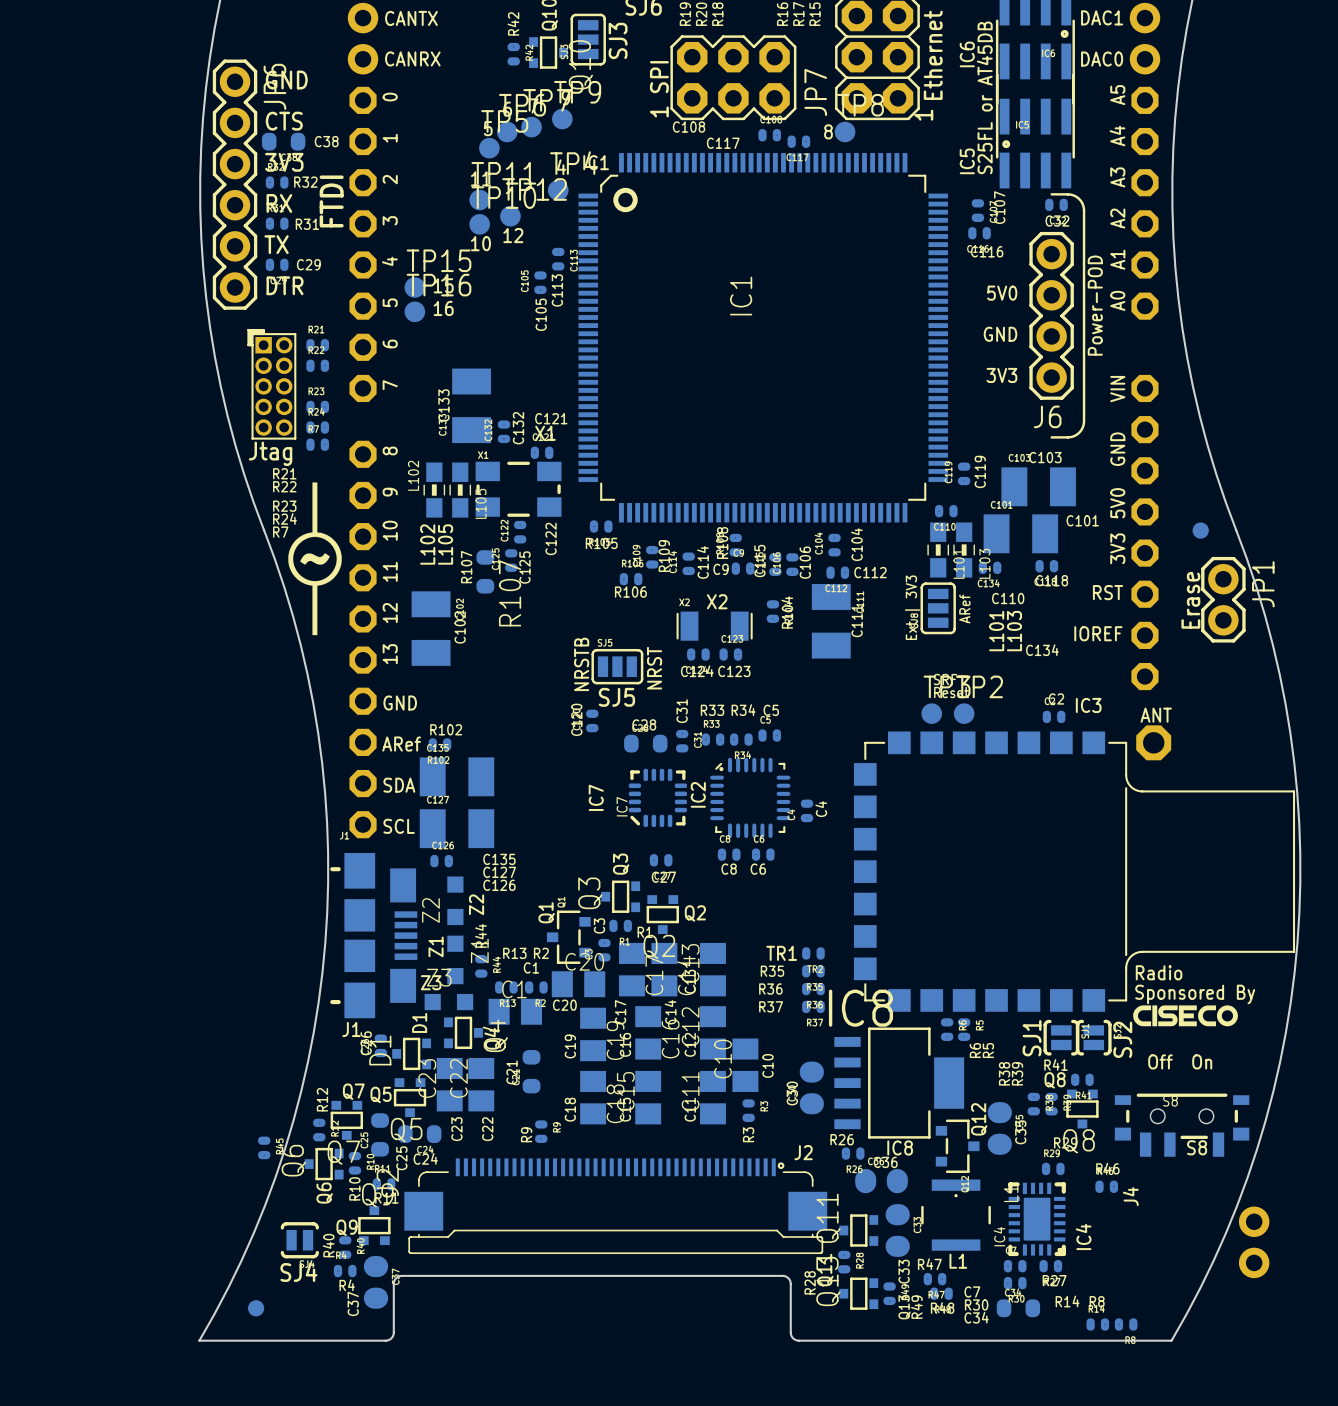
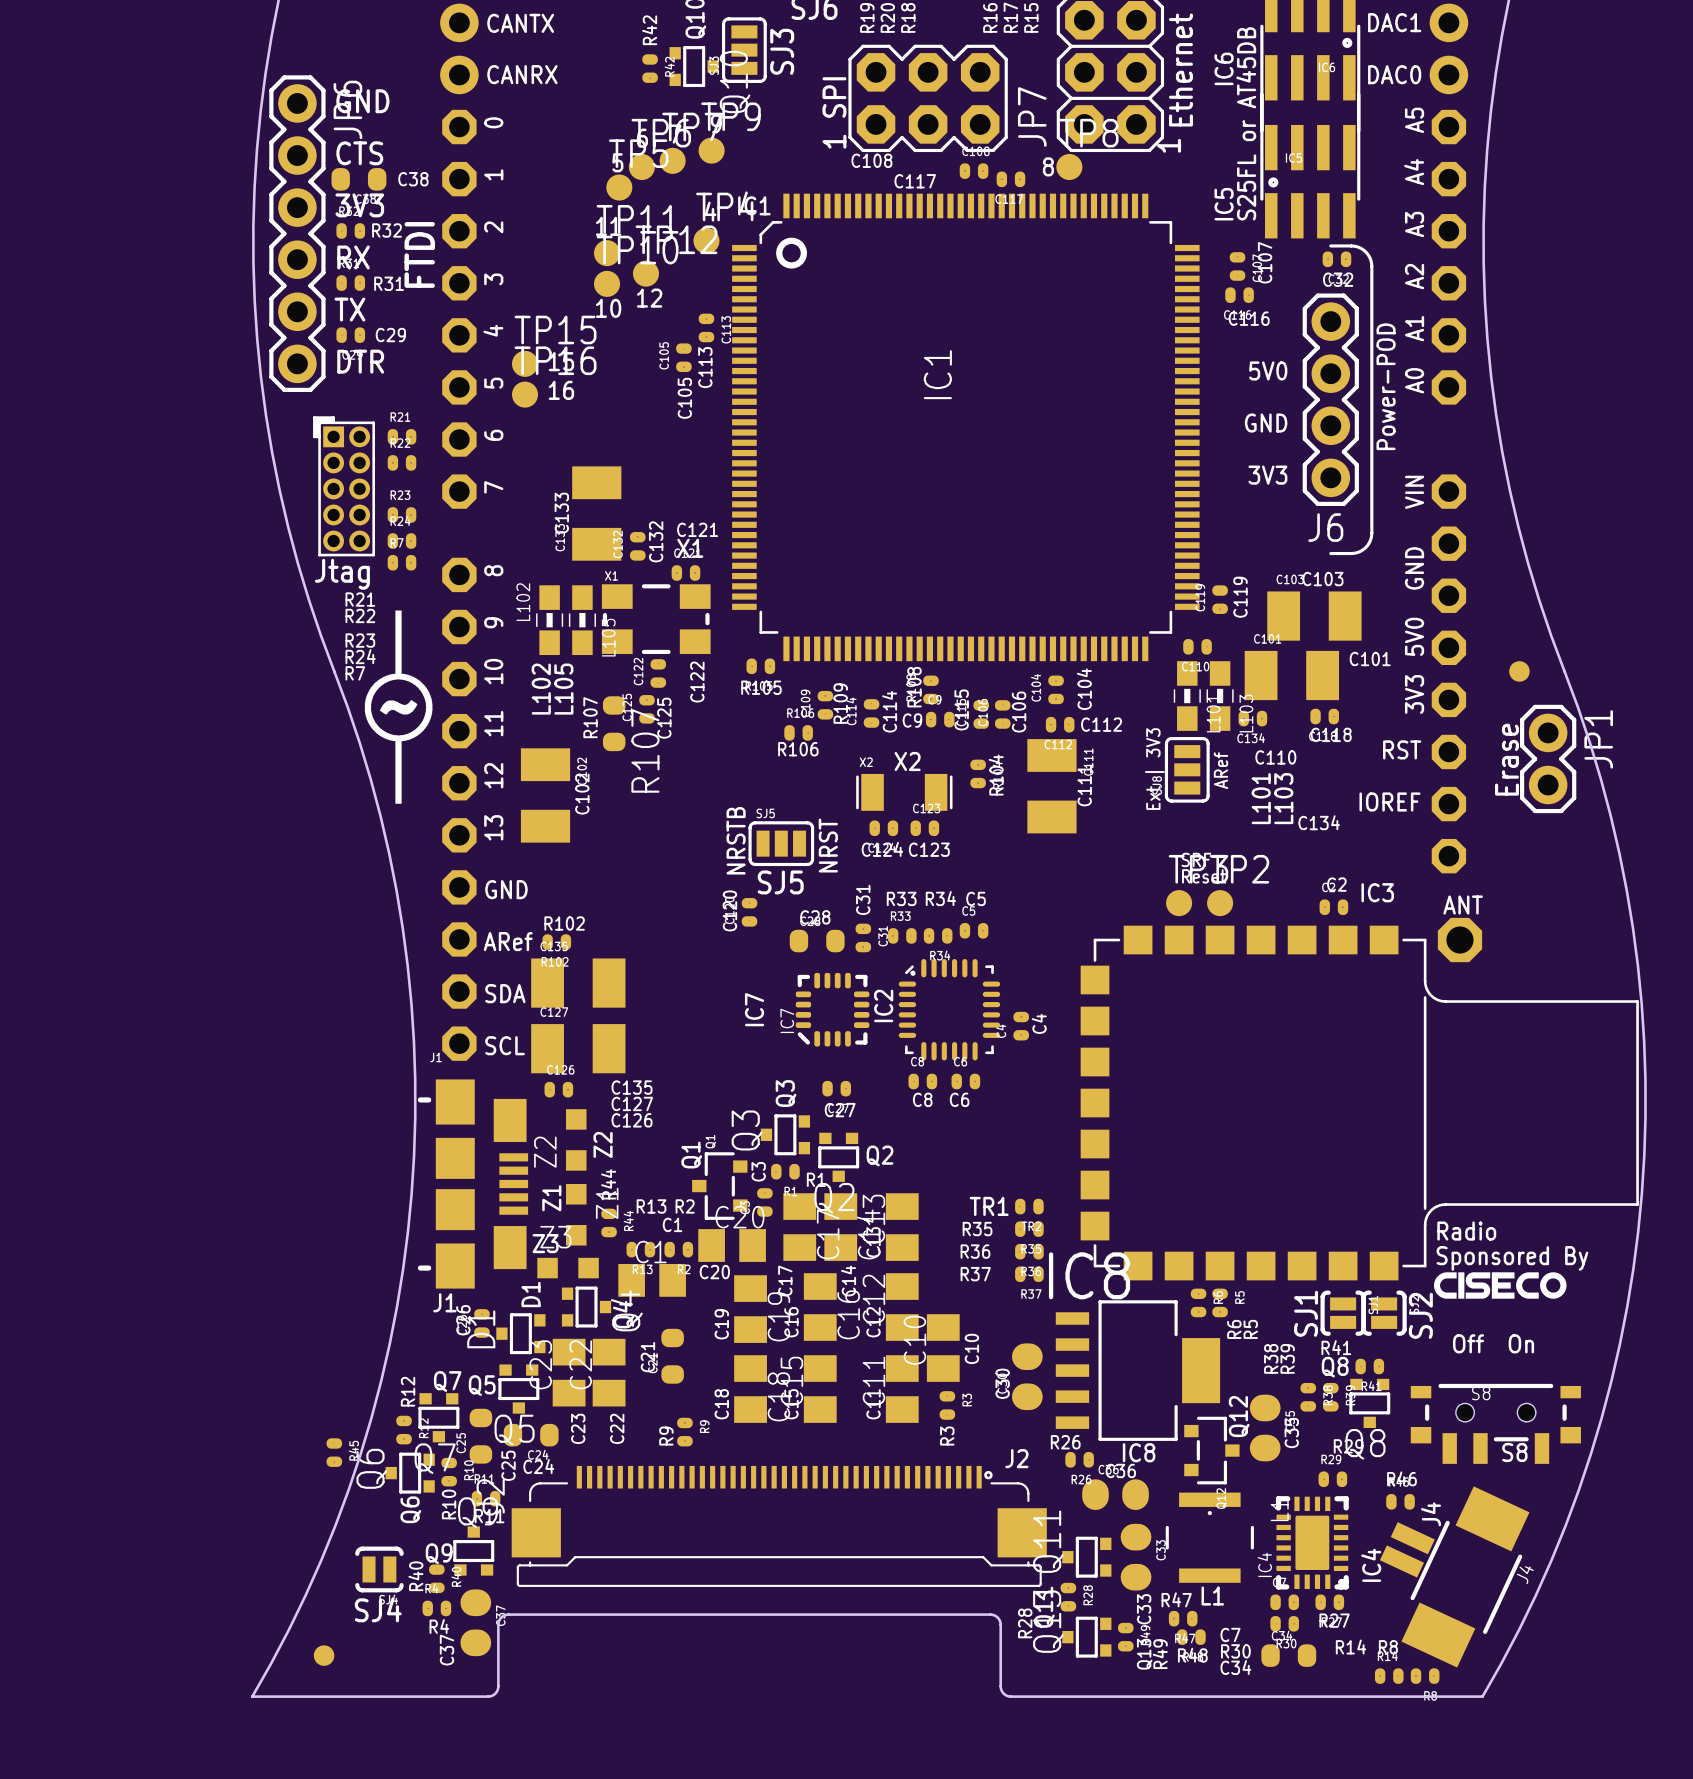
part: (1254, 1242) -> none
J4: none -> (1454, 1576)

